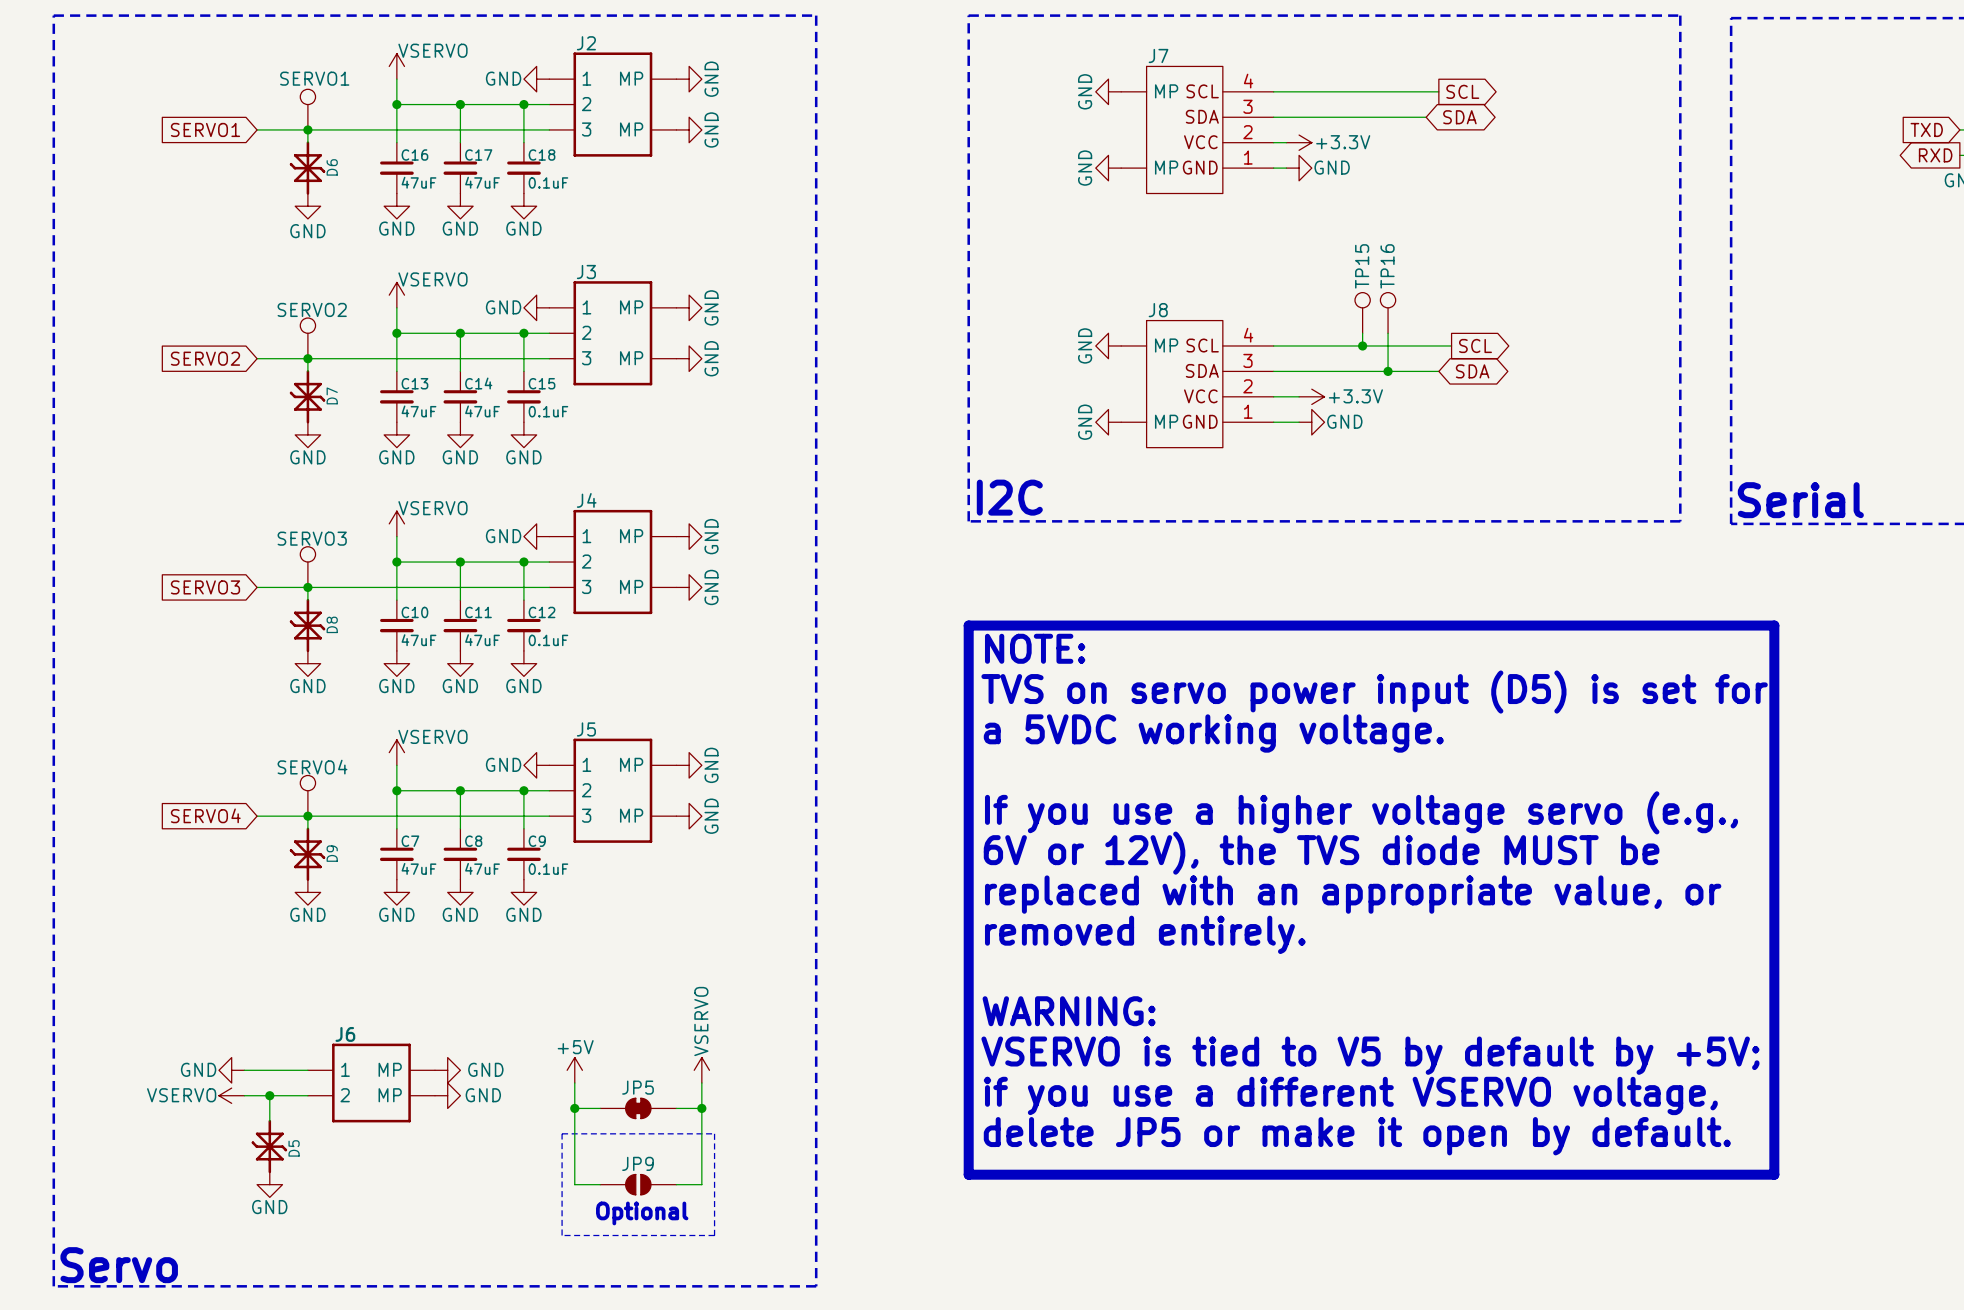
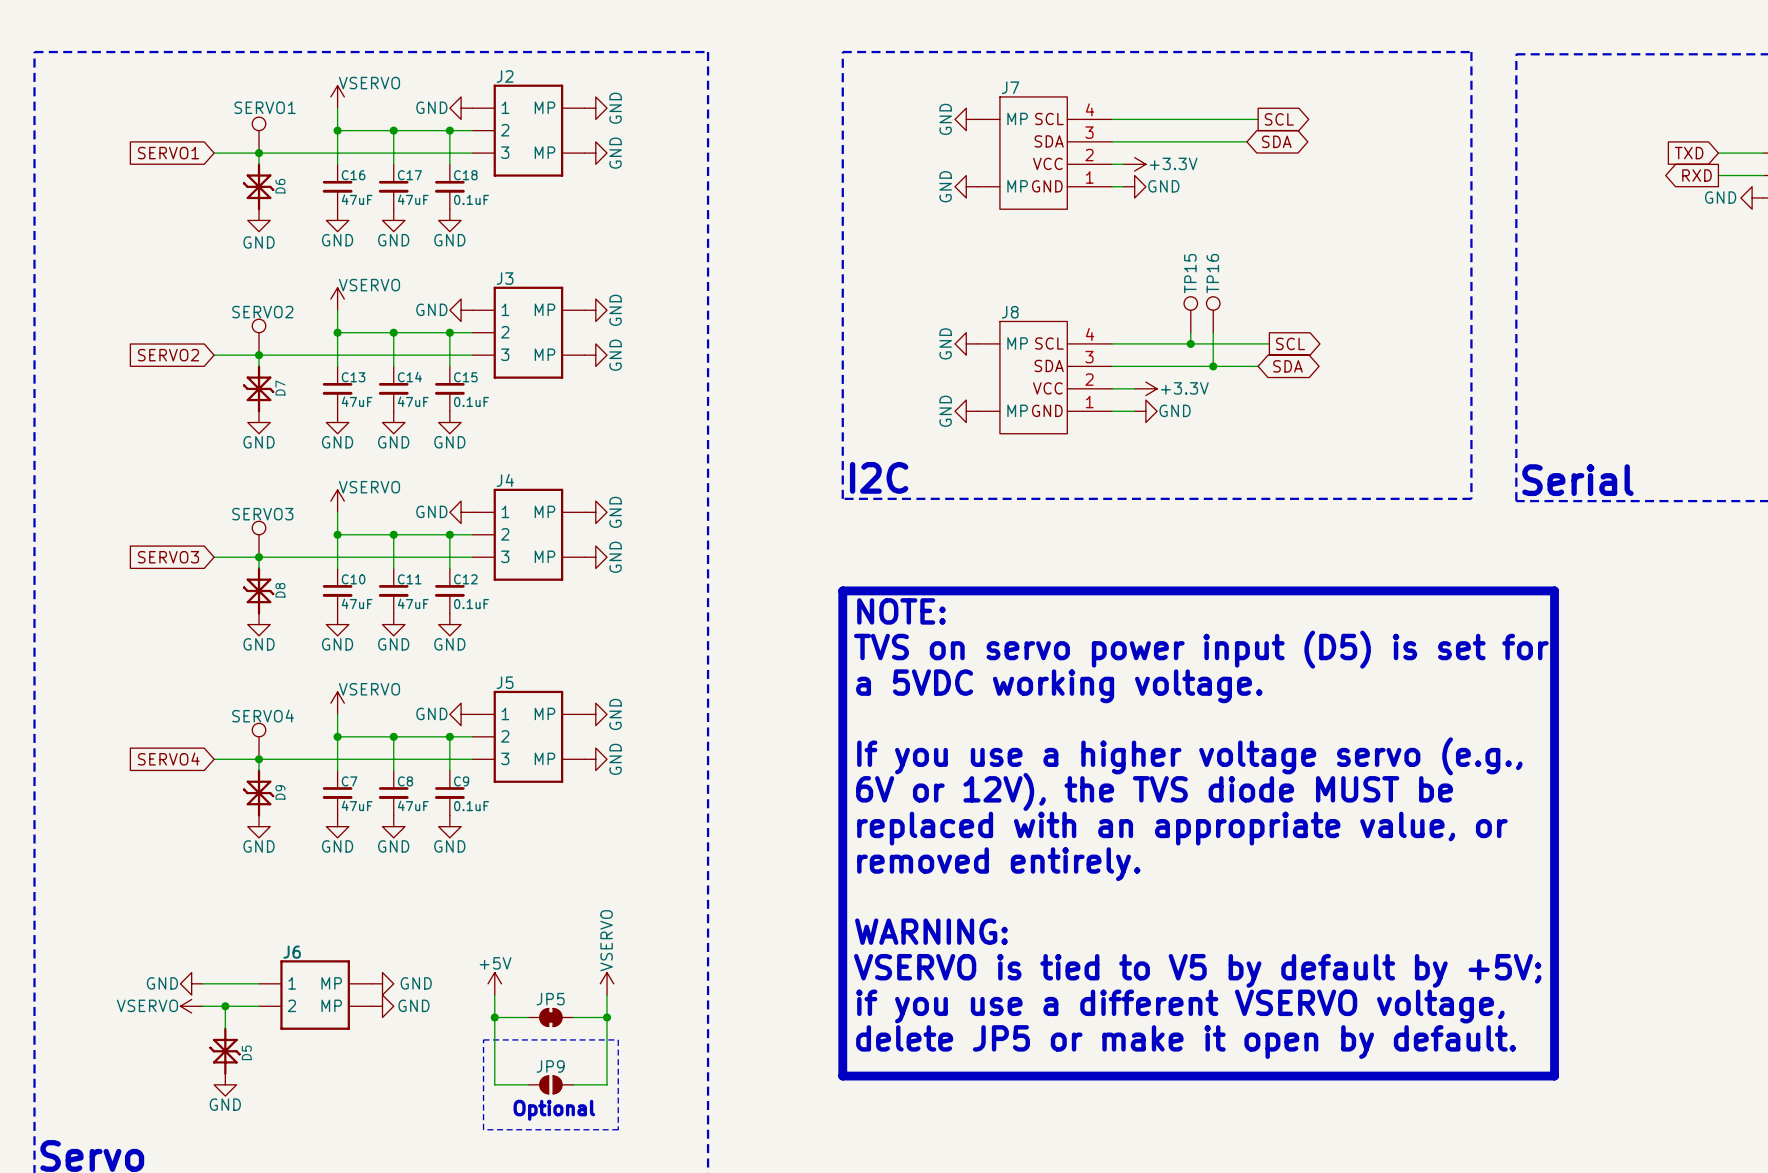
JP5 symbol: [600, 1098, 677, 1119] -> [528, 1007, 574, 1028]
JP9 symbol: [600, 1174, 677, 1195] -> [528, 1075, 574, 1094]

